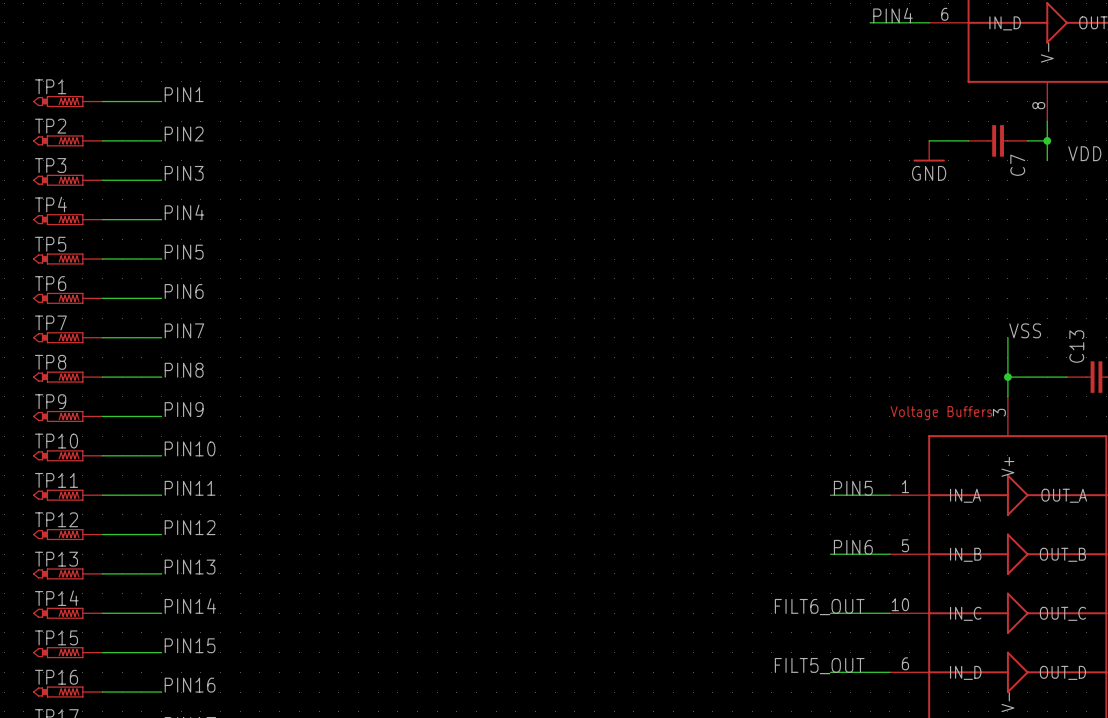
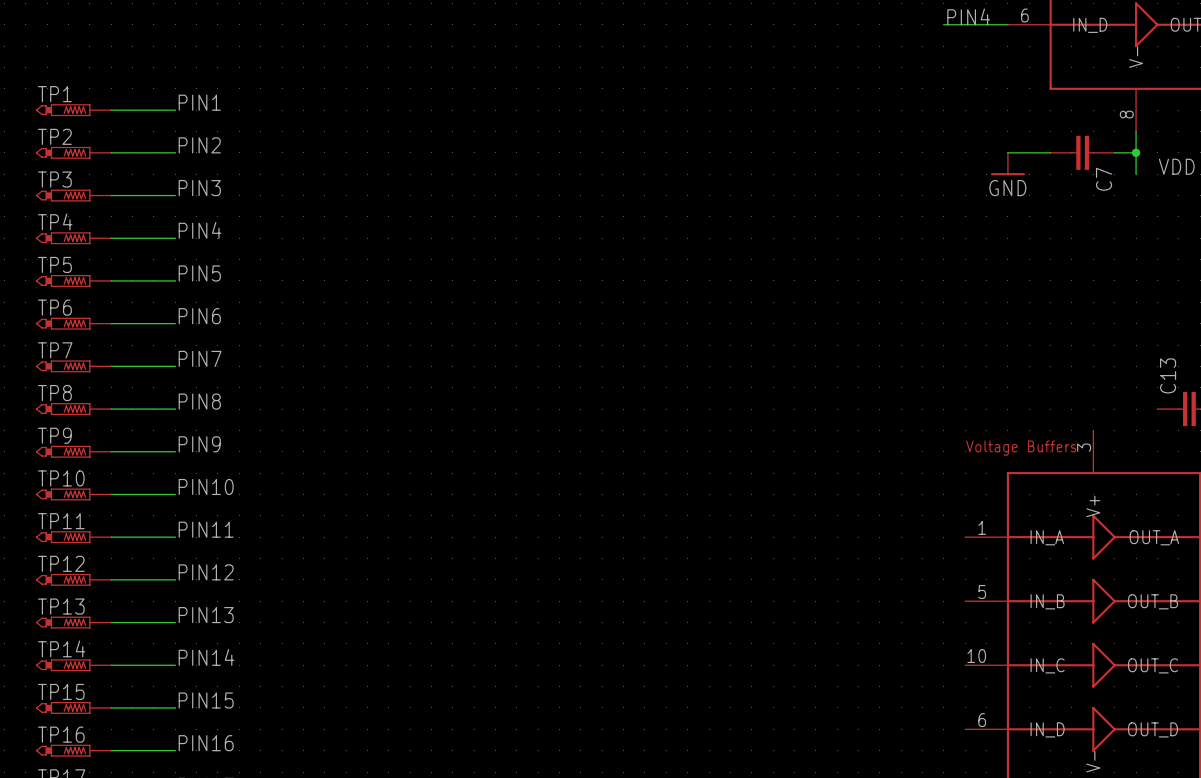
label: VSS (1025, 330) -> none
wire: (1007, 337) (1007, 396) -> none
wire: (1007, 377) (1066, 377) -> none
junction: (1007, 377) -> none
label: PIN5 (853, 488) -> none
wire: (830, 495) (889, 495) -> none
label: PIN6 (853, 547) -> none
wire: (830, 554) (889, 554) -> none
label: FILT6_OUT (819, 607) -> none
wire: (830, 613) (889, 613) -> none
label: FILT5_OUT (819, 666) -> none
wire: (830, 672) (889, 672) -> none

